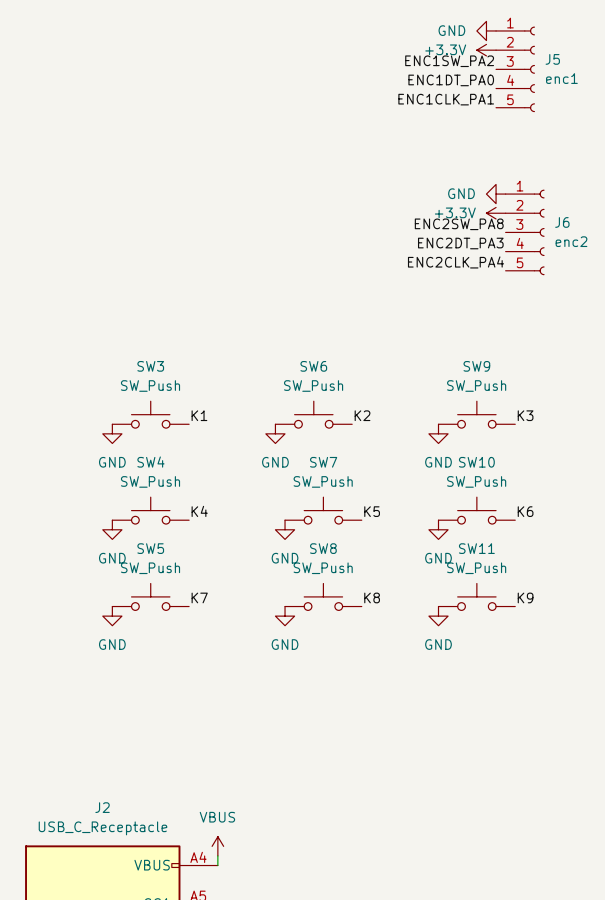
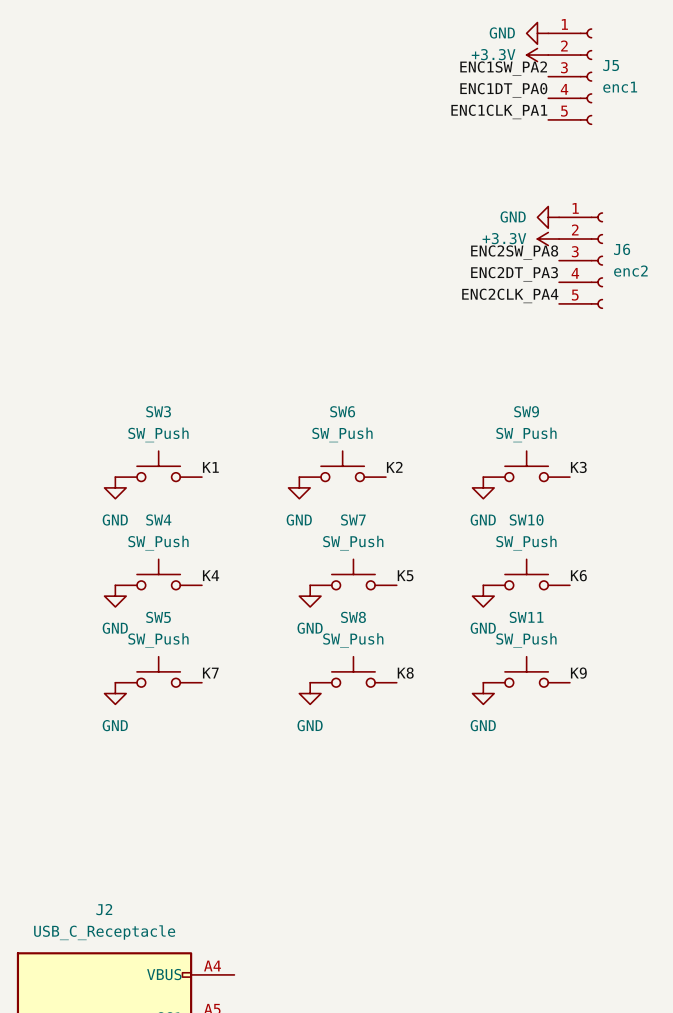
power symbol: VBUS (217, 846) -> none
wire: (217, 855) (217, 865) -> none

